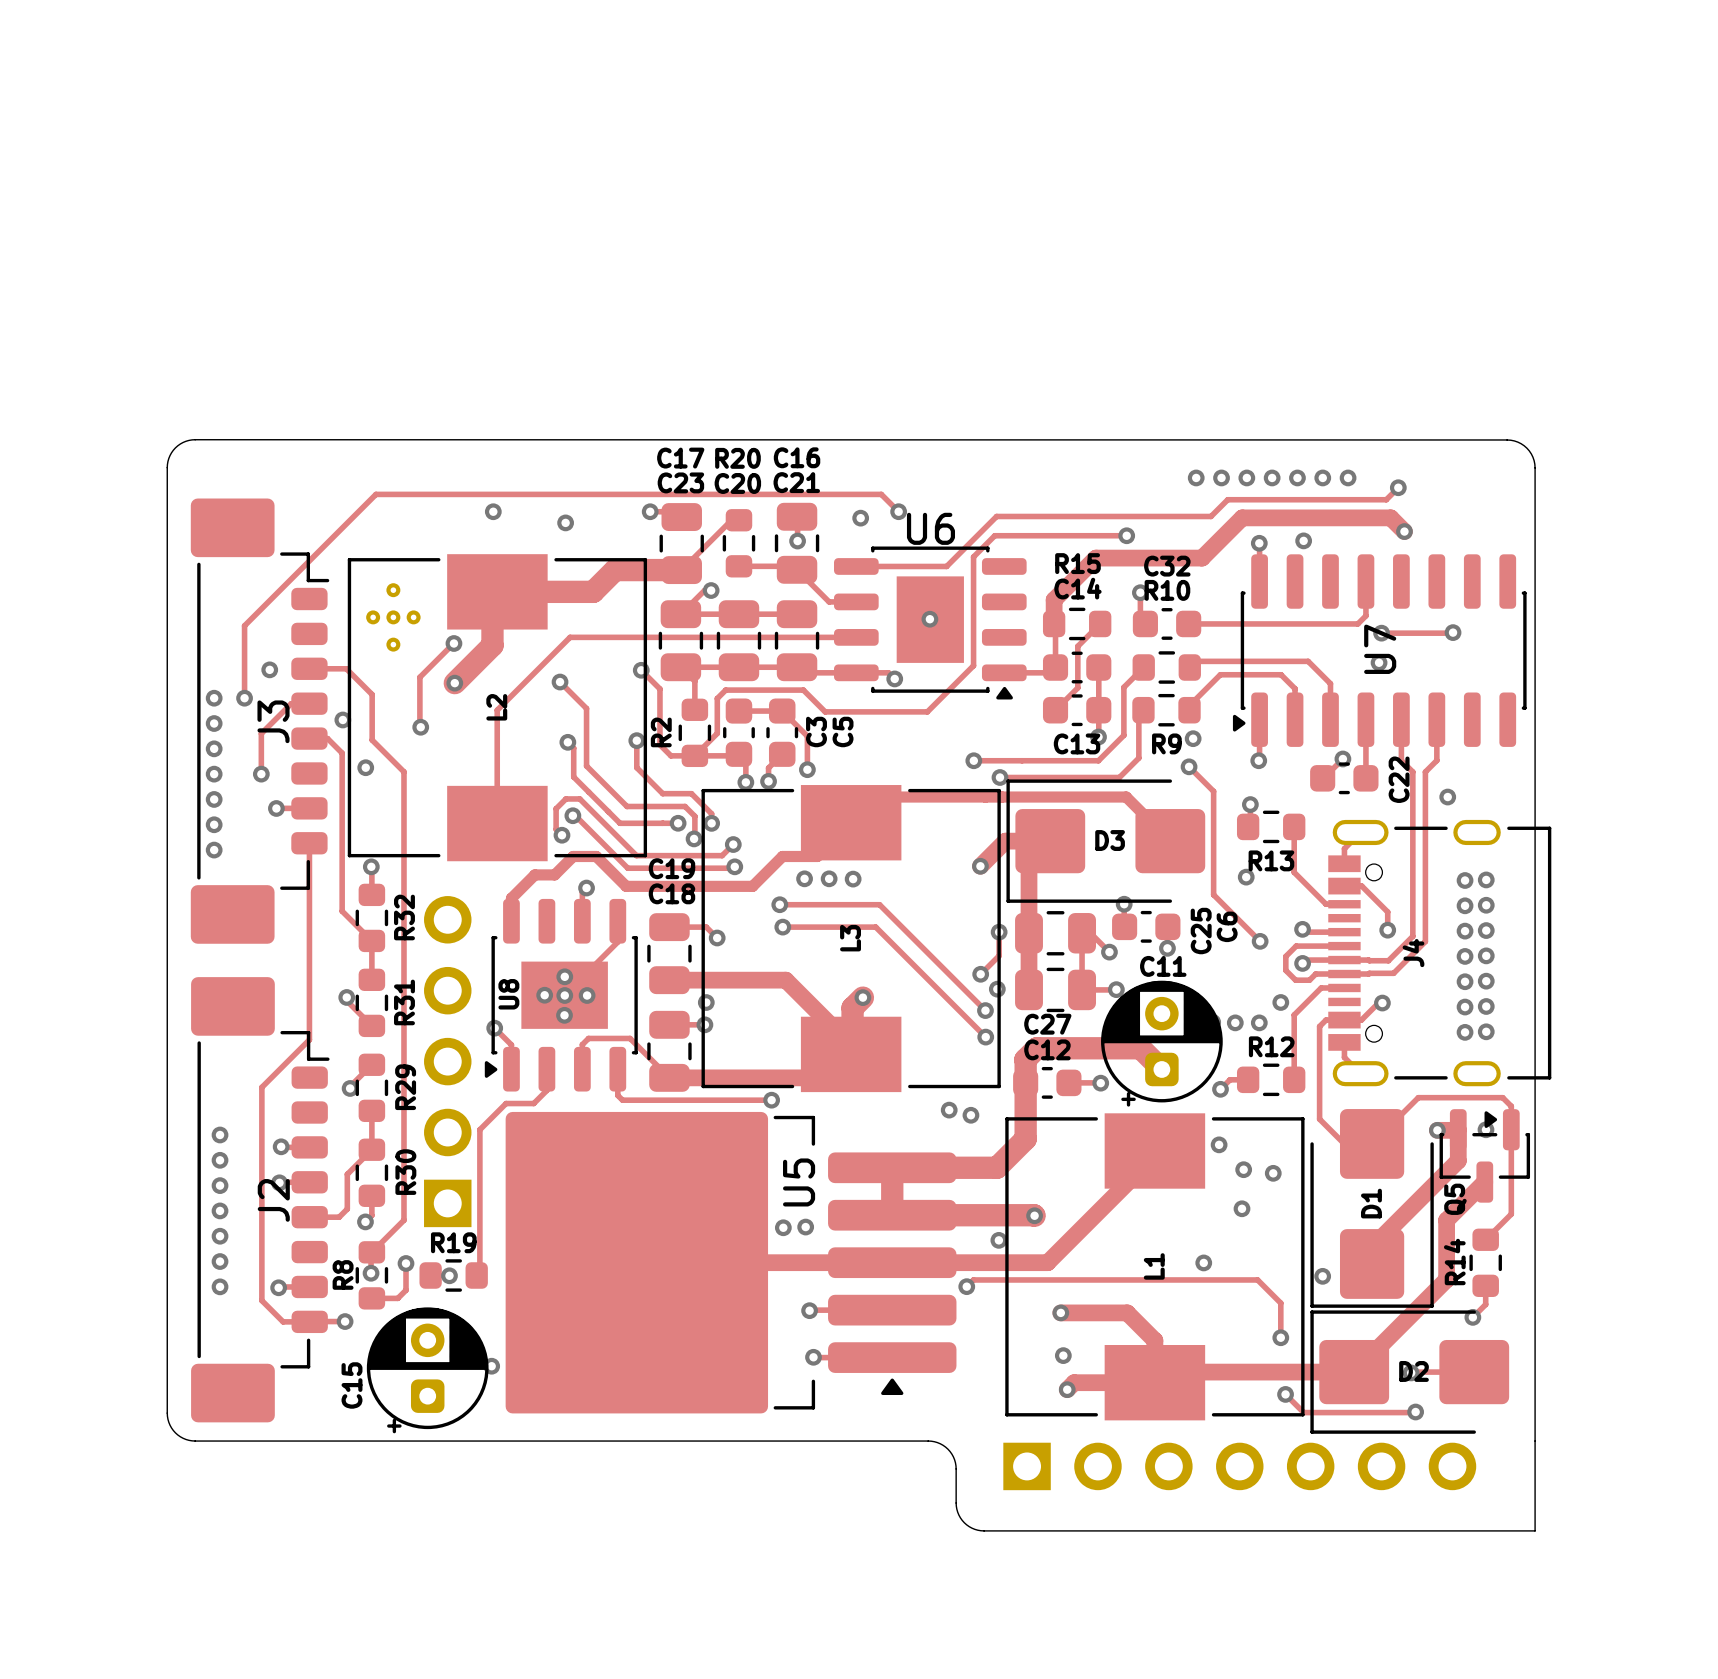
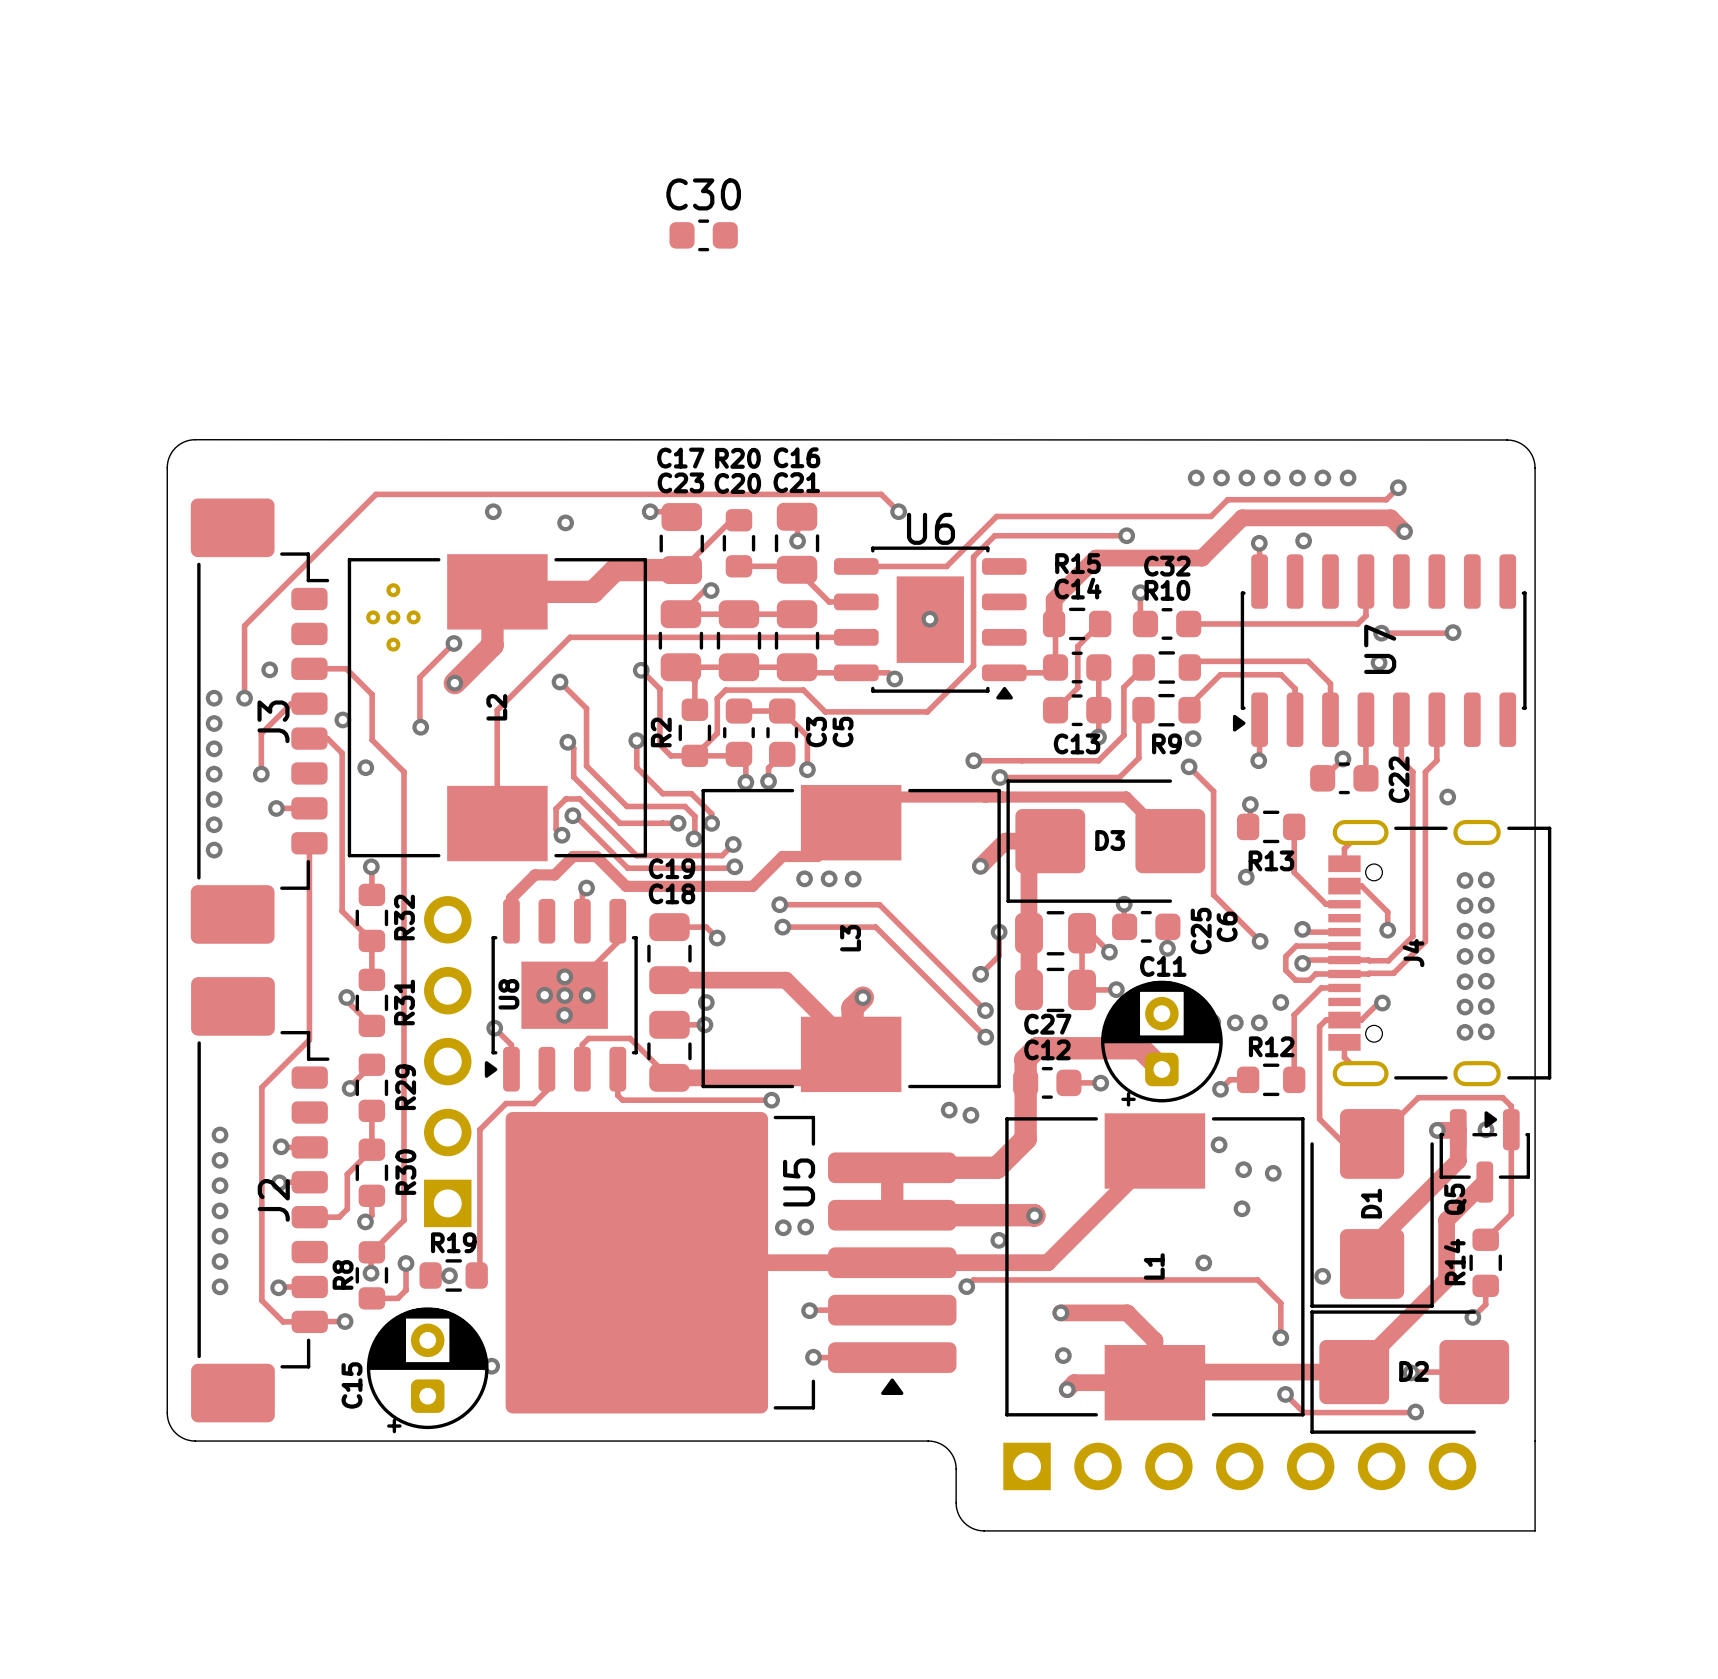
C30: none -> (703, 235)
via: (860, 518) -> none
via: (997, 989) -> none

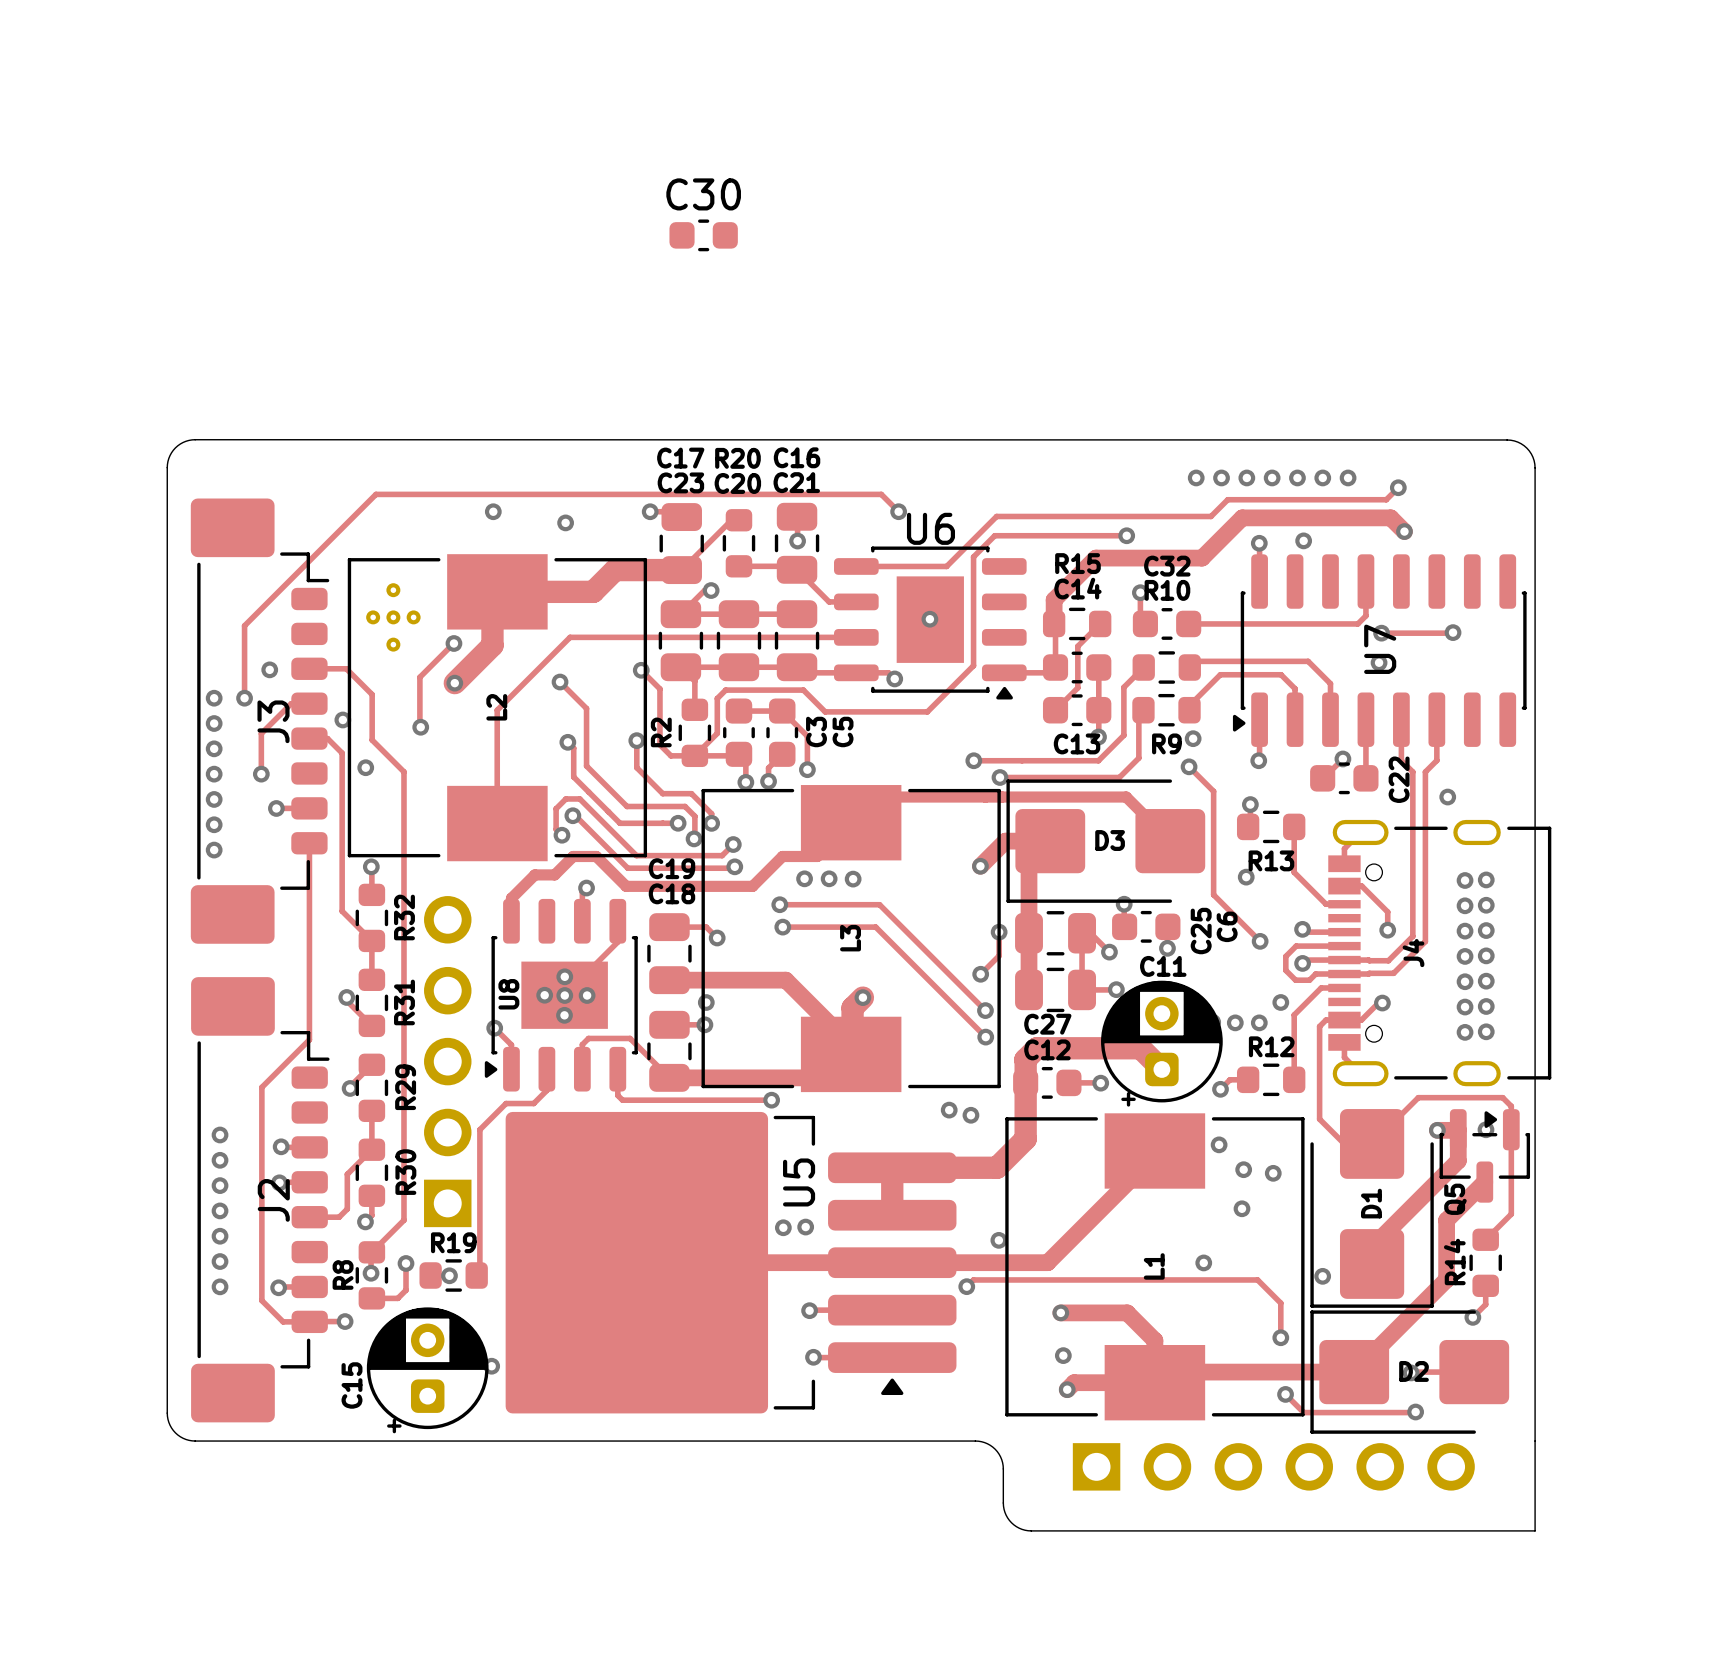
track: (892, 1215) (1034, 1215) -> none
via: (1034, 1215) -> none
board edge: (928, 1441) (943, 1445) (953, 1456) (955, 1465) (956, 1509) (960, 1517) (966, 1524) (980, 1530) (1031, 1530) -> (928, 1441) (978, 1441) (992, 1447) (999, 1454) (1002, 1462) (1003, 1506) (1006, 1515) (1016, 1526) (1031, 1530)
part: (1239, 1466) -> none
part: none -> (1273, 1466)

